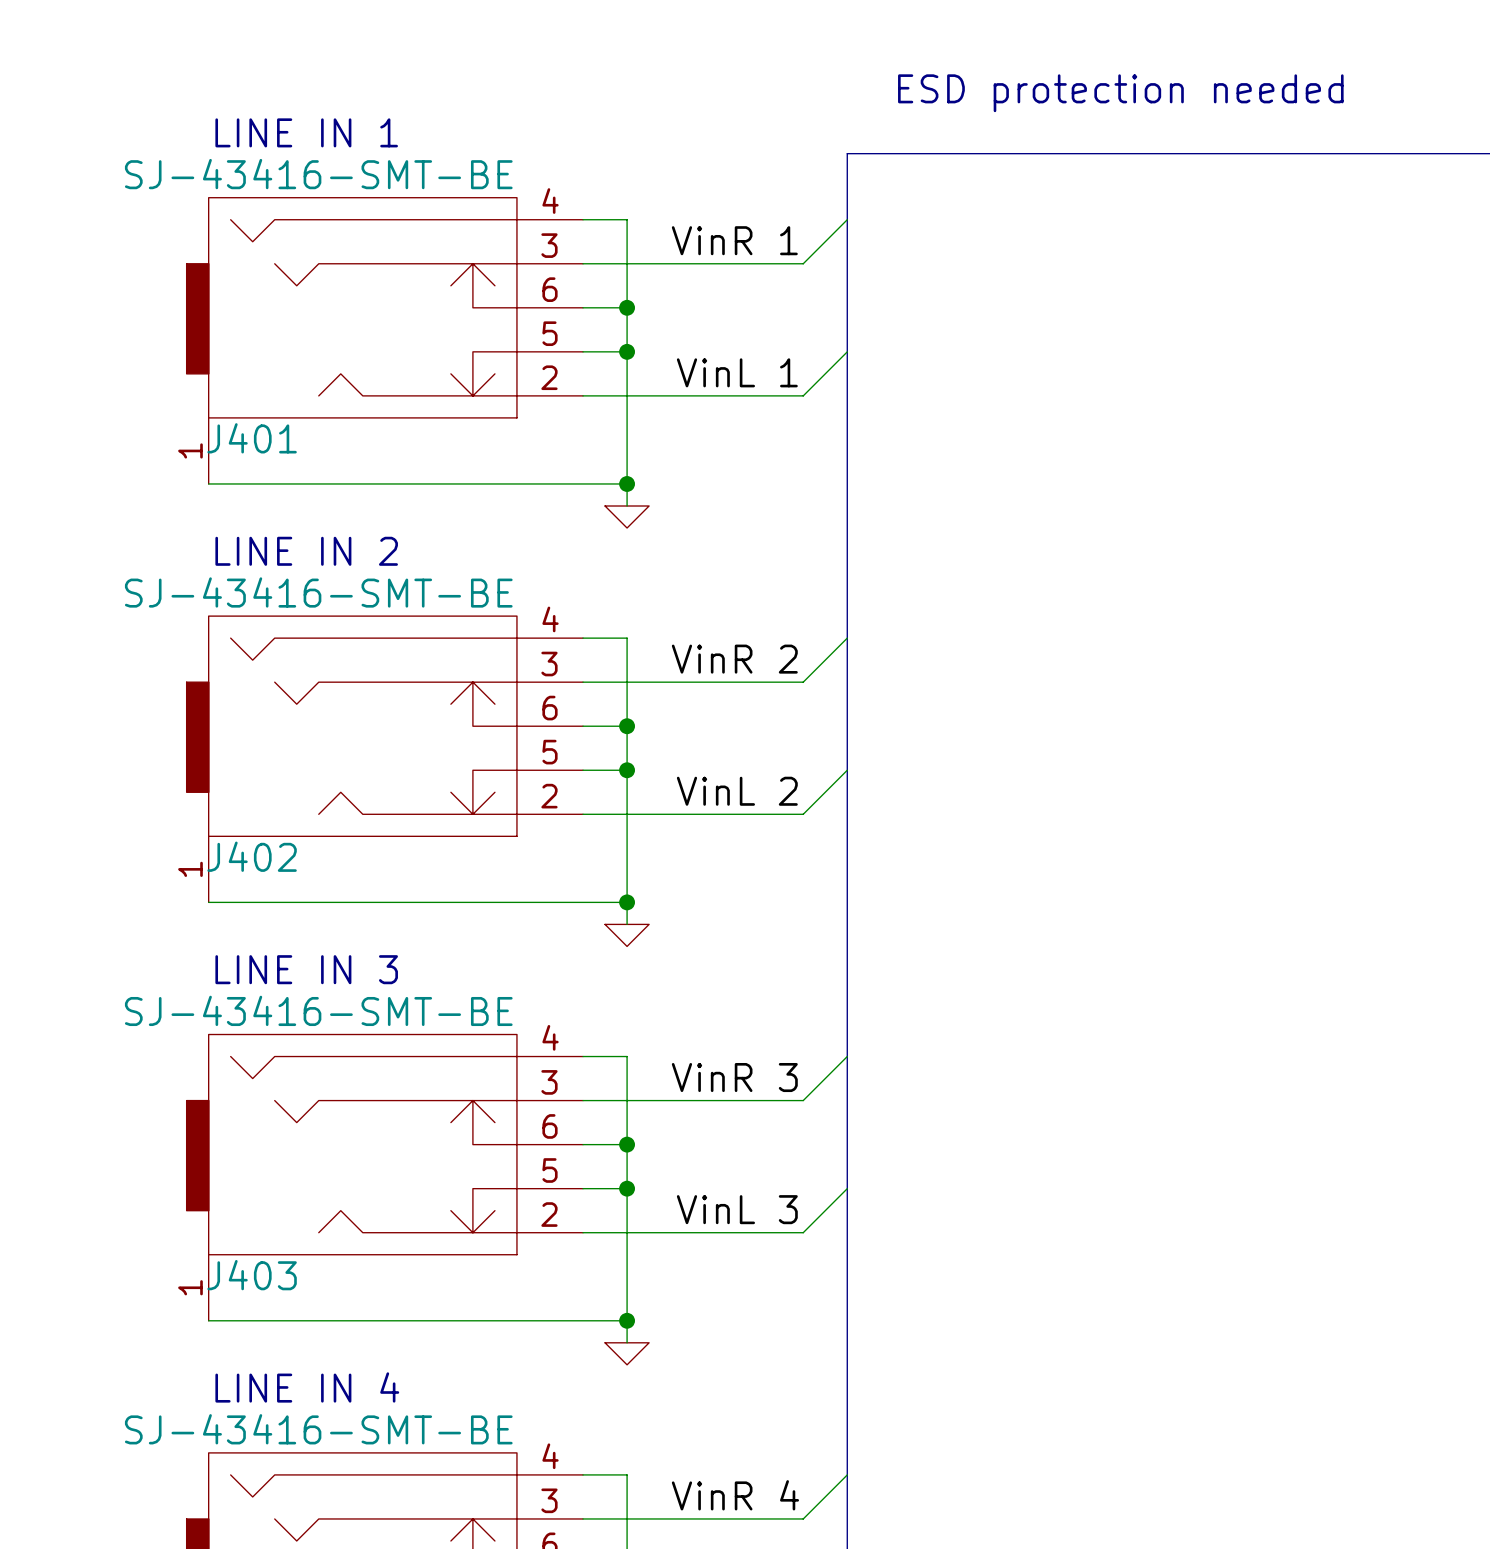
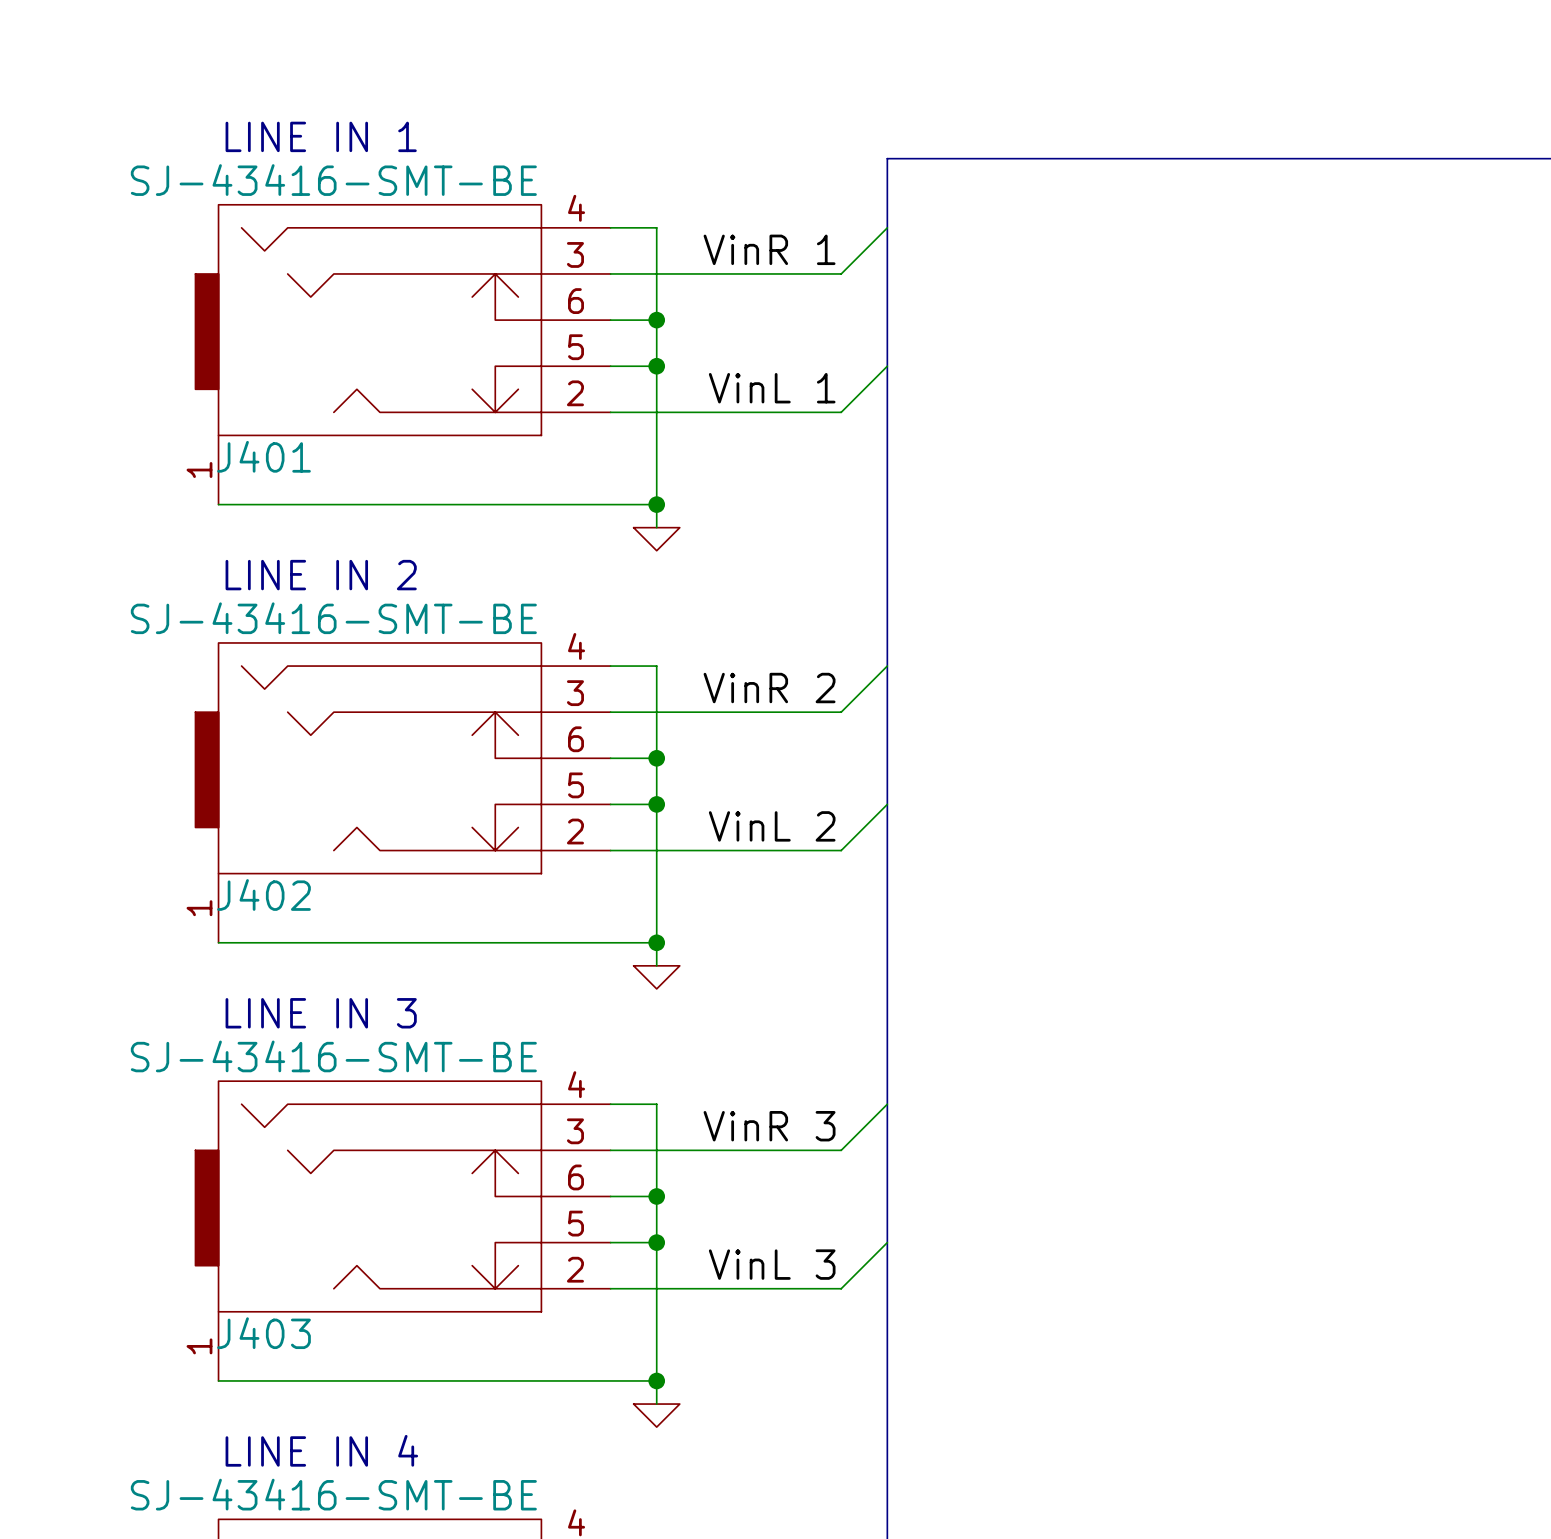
text: ESD protection needed (1120, 93) -> none

